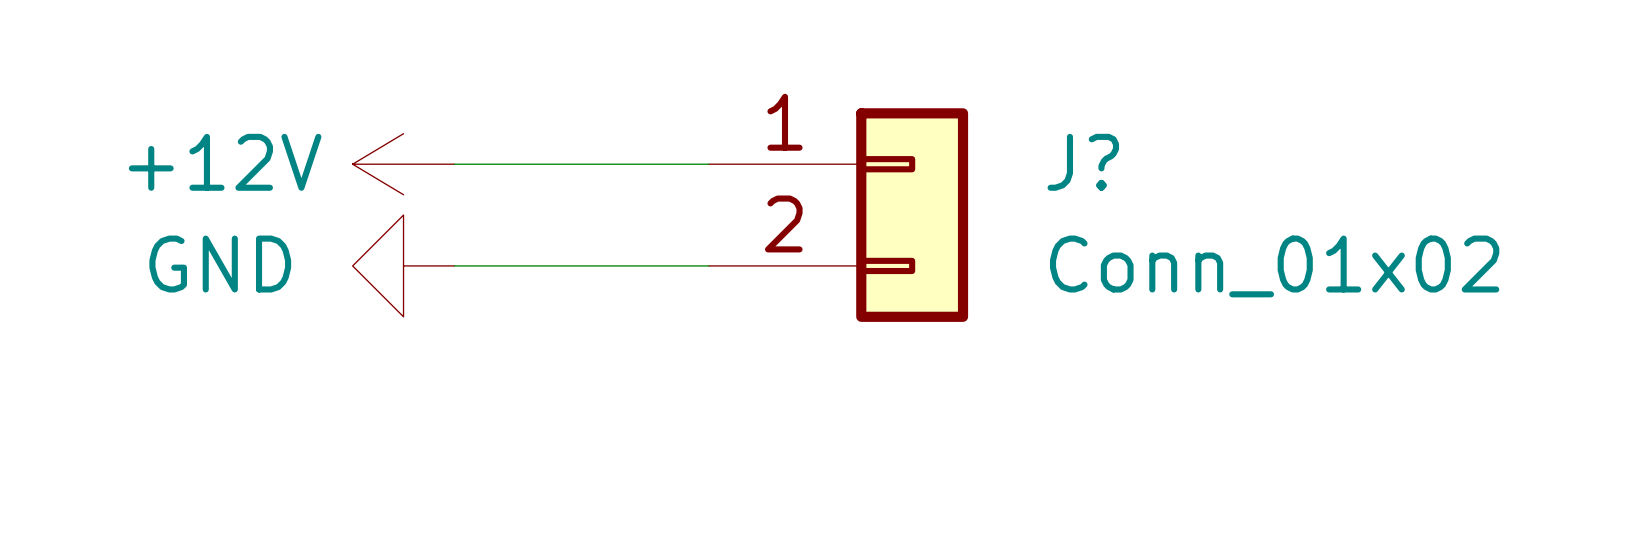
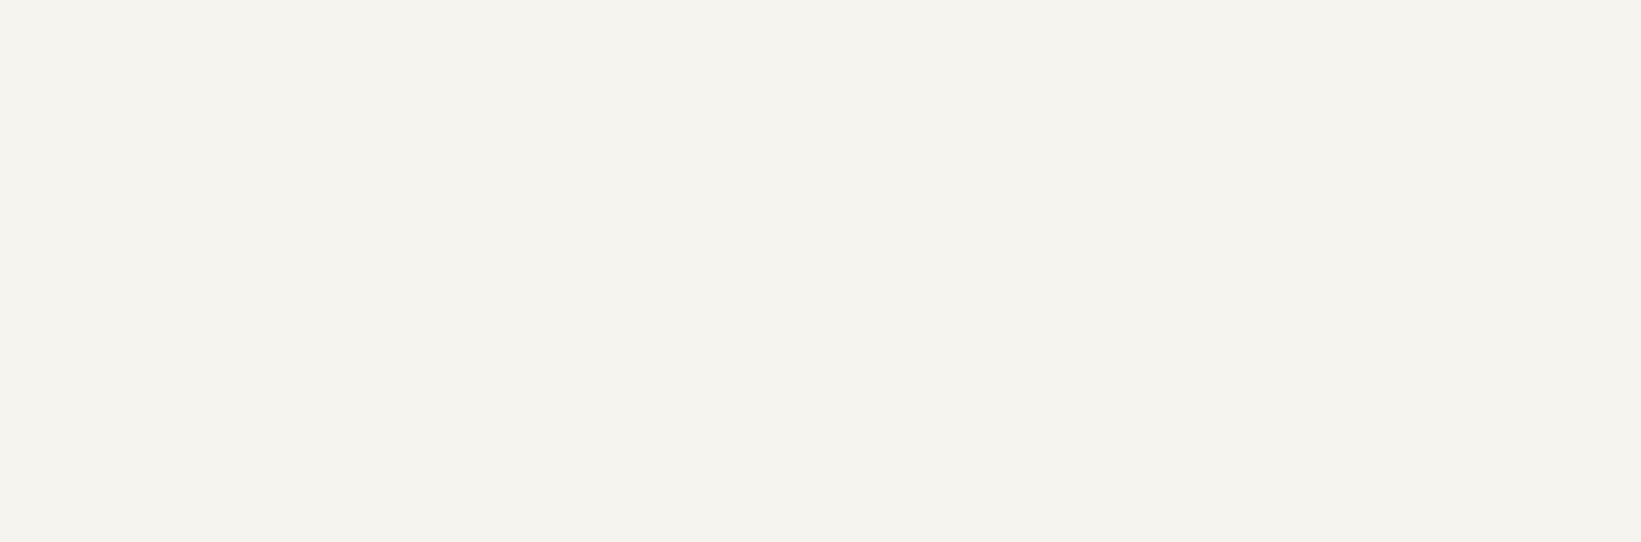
power symbol: +12V (403, 164) -> none
wire: (454, 164) (708, 164) -> none
J?: Conn_01x02 (838, 215) -> none
power symbol: GND (403, 265) -> none
wire: (454, 265) (708, 265) -> none

